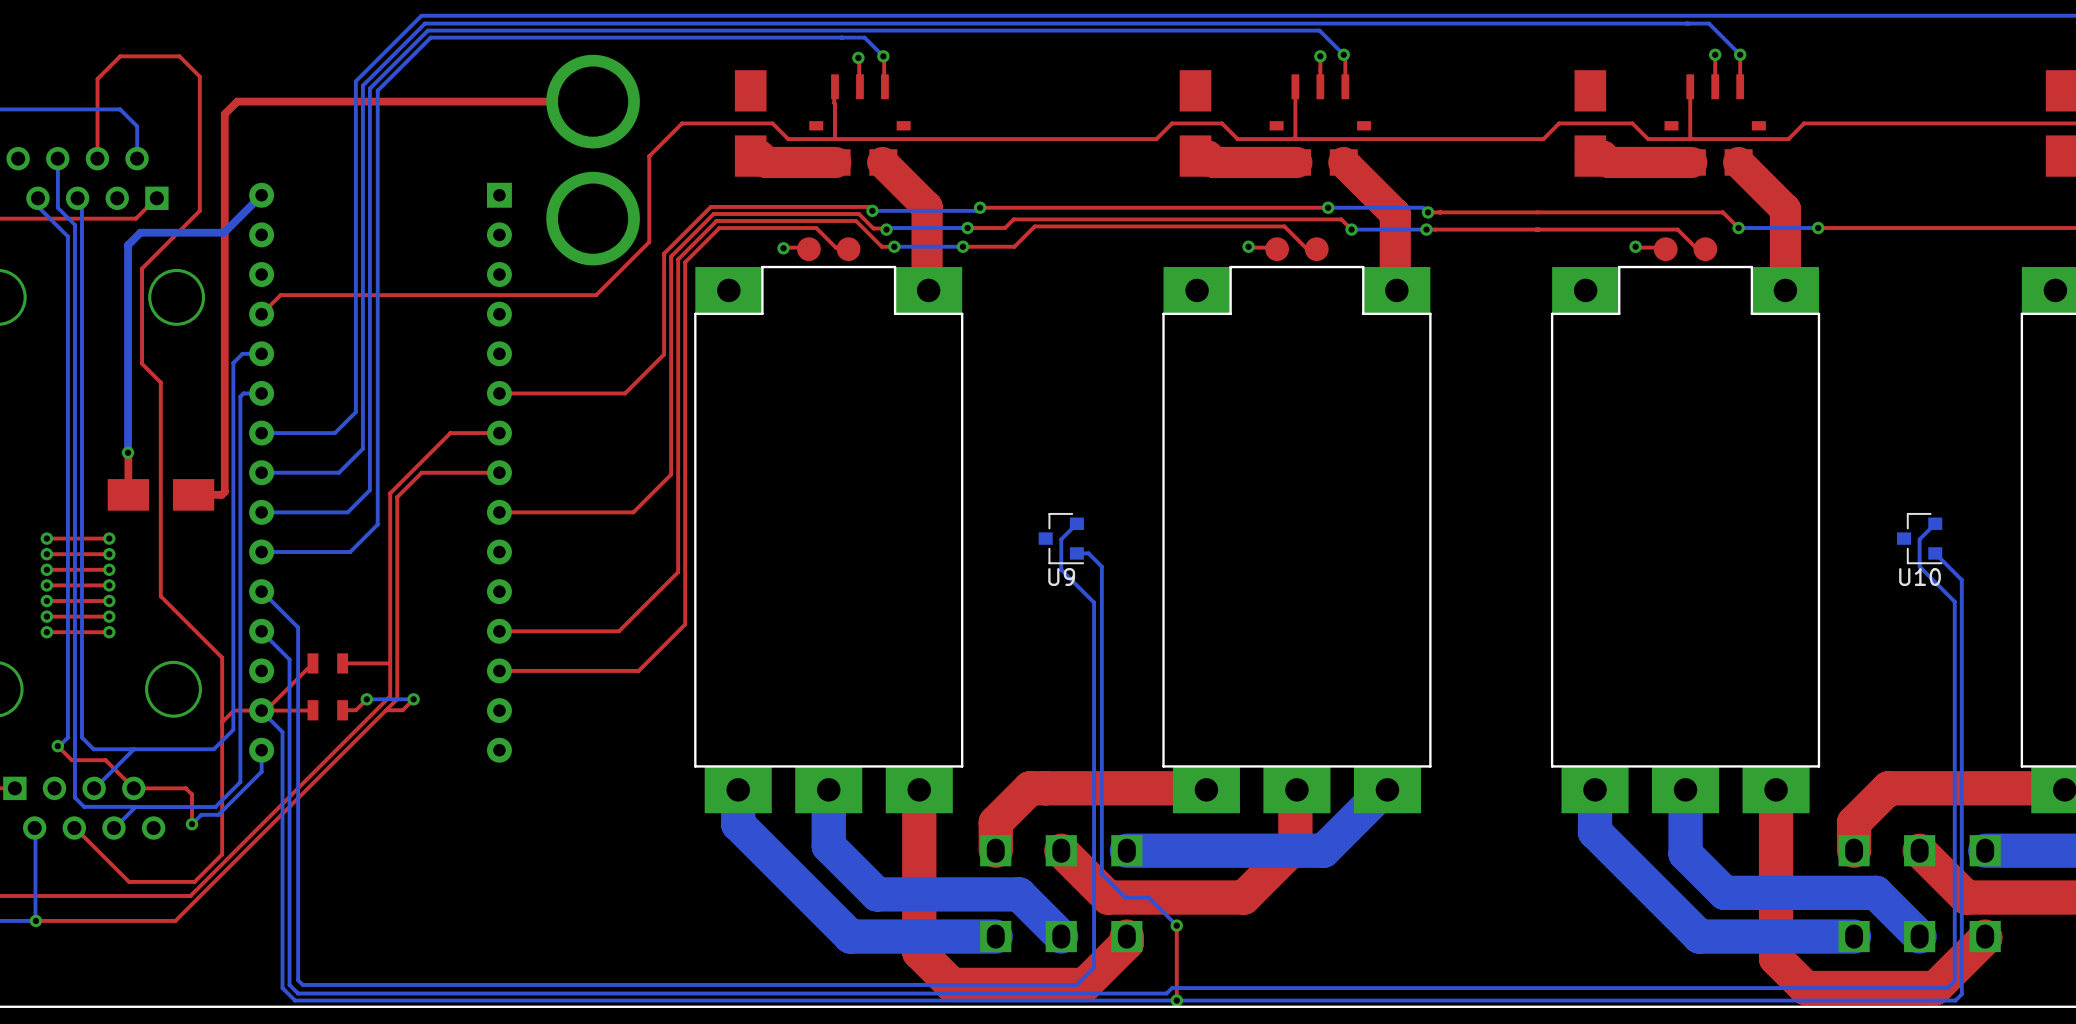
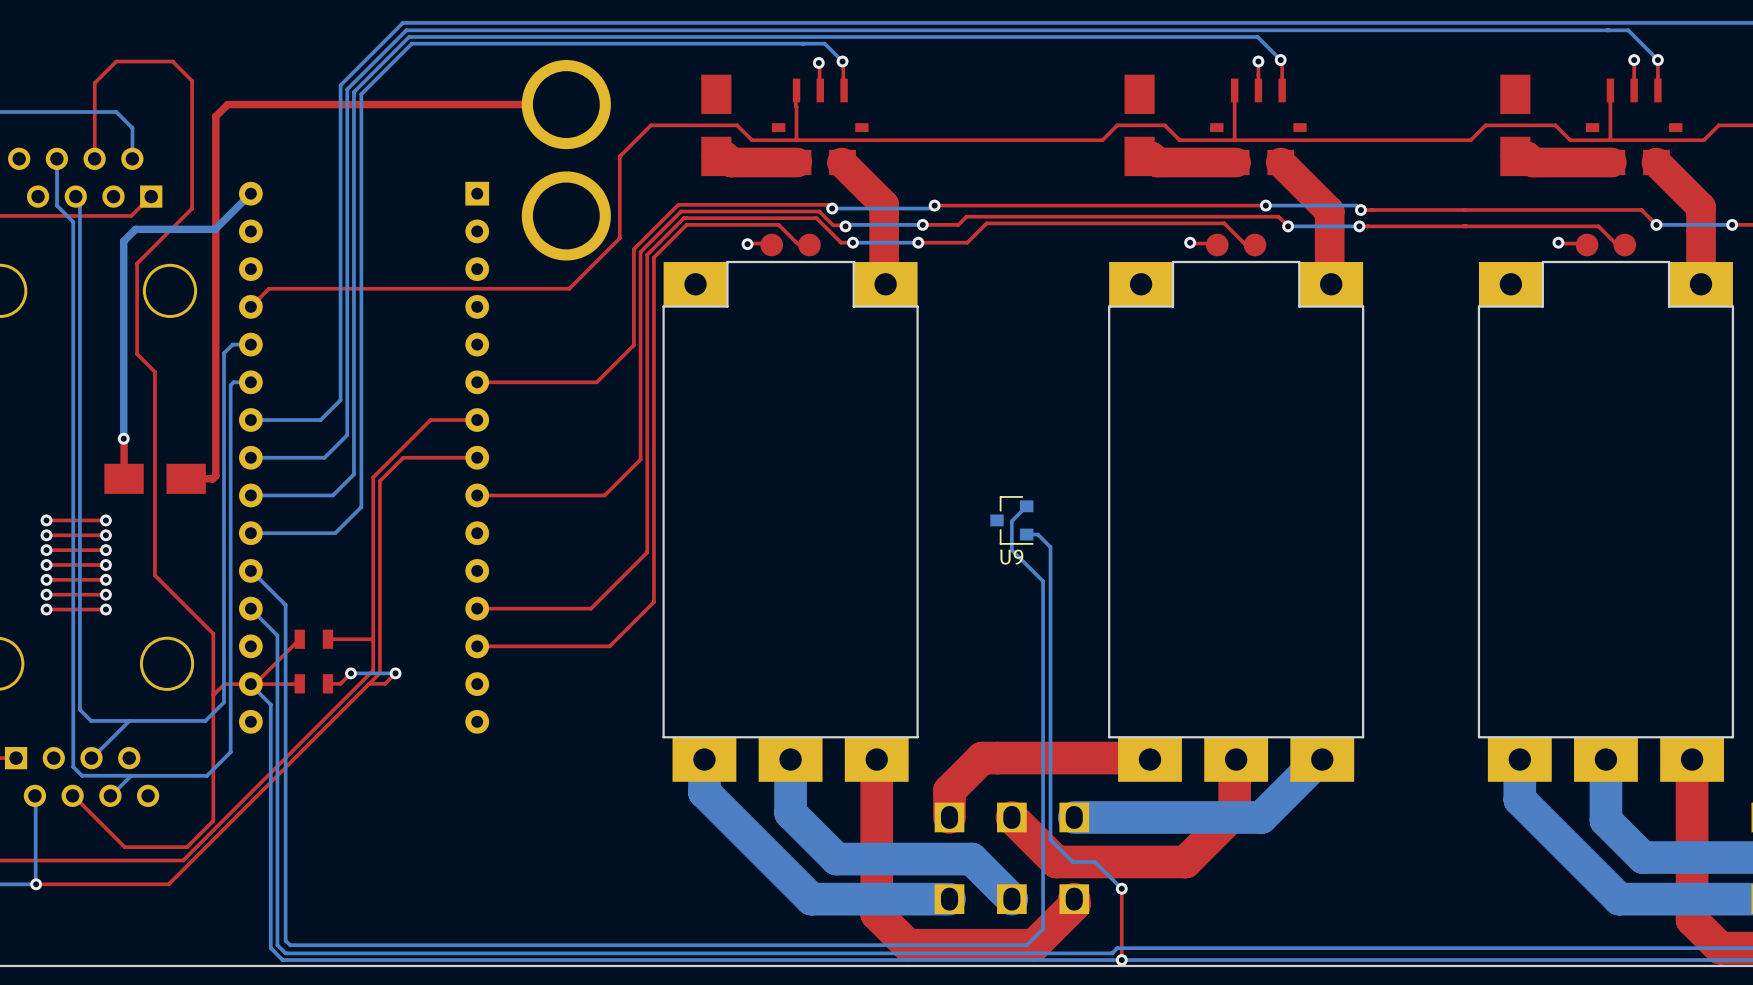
bottom track: (37, 198) (37, 206) (67, 236) (67, 737) (57, 746) -> none
top track: (57, 746) (71, 760) (105, 760) (133, 788) (185, 788) (192, 794) (192, 824) -> none
via: (57, 746) -> none
bottom track: (261, 750) (261, 771) (218, 814) (201, 814) (192, 824) -> none
via: (192, 824) -> none

